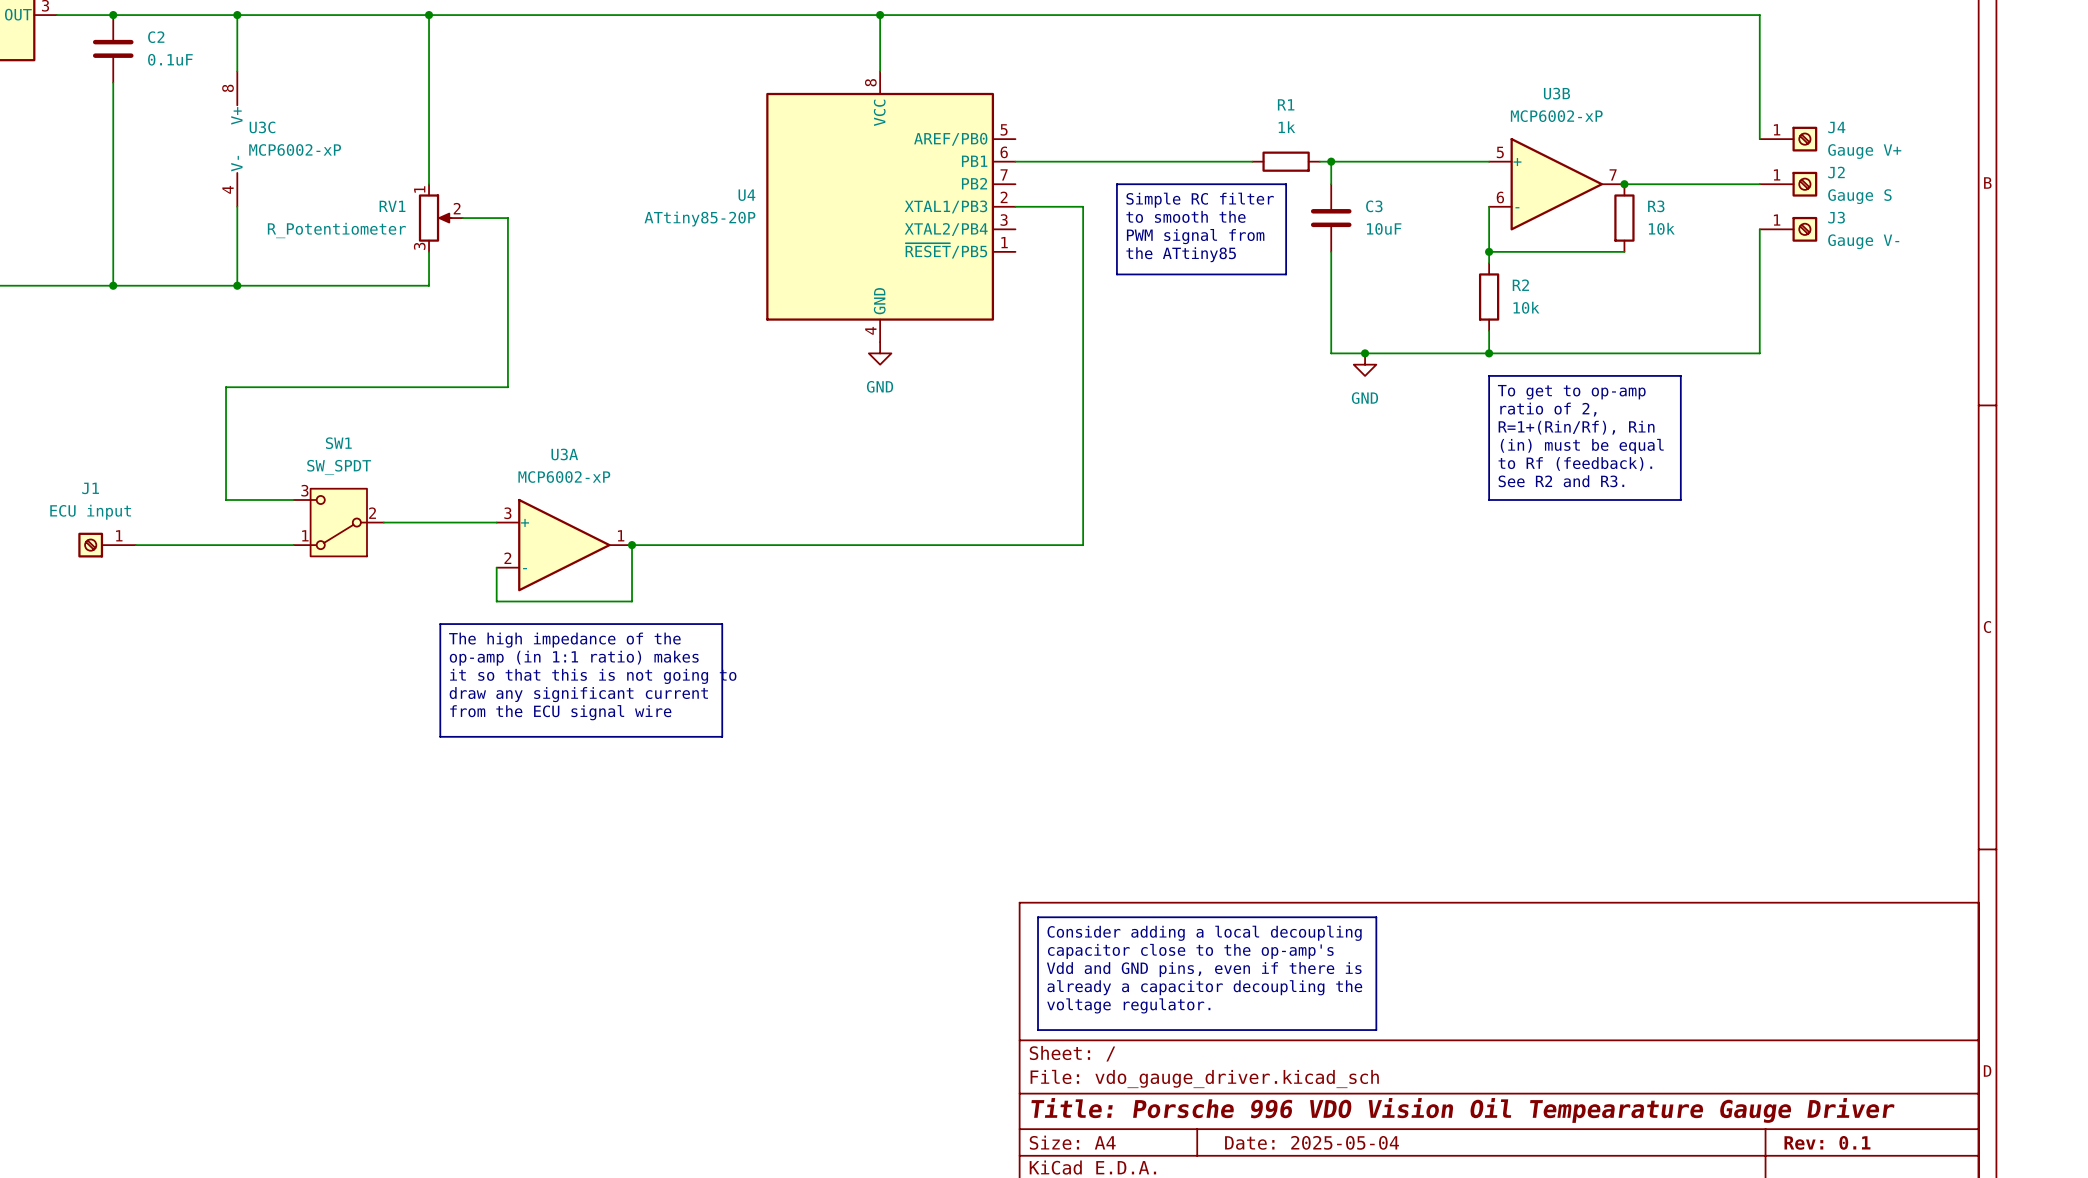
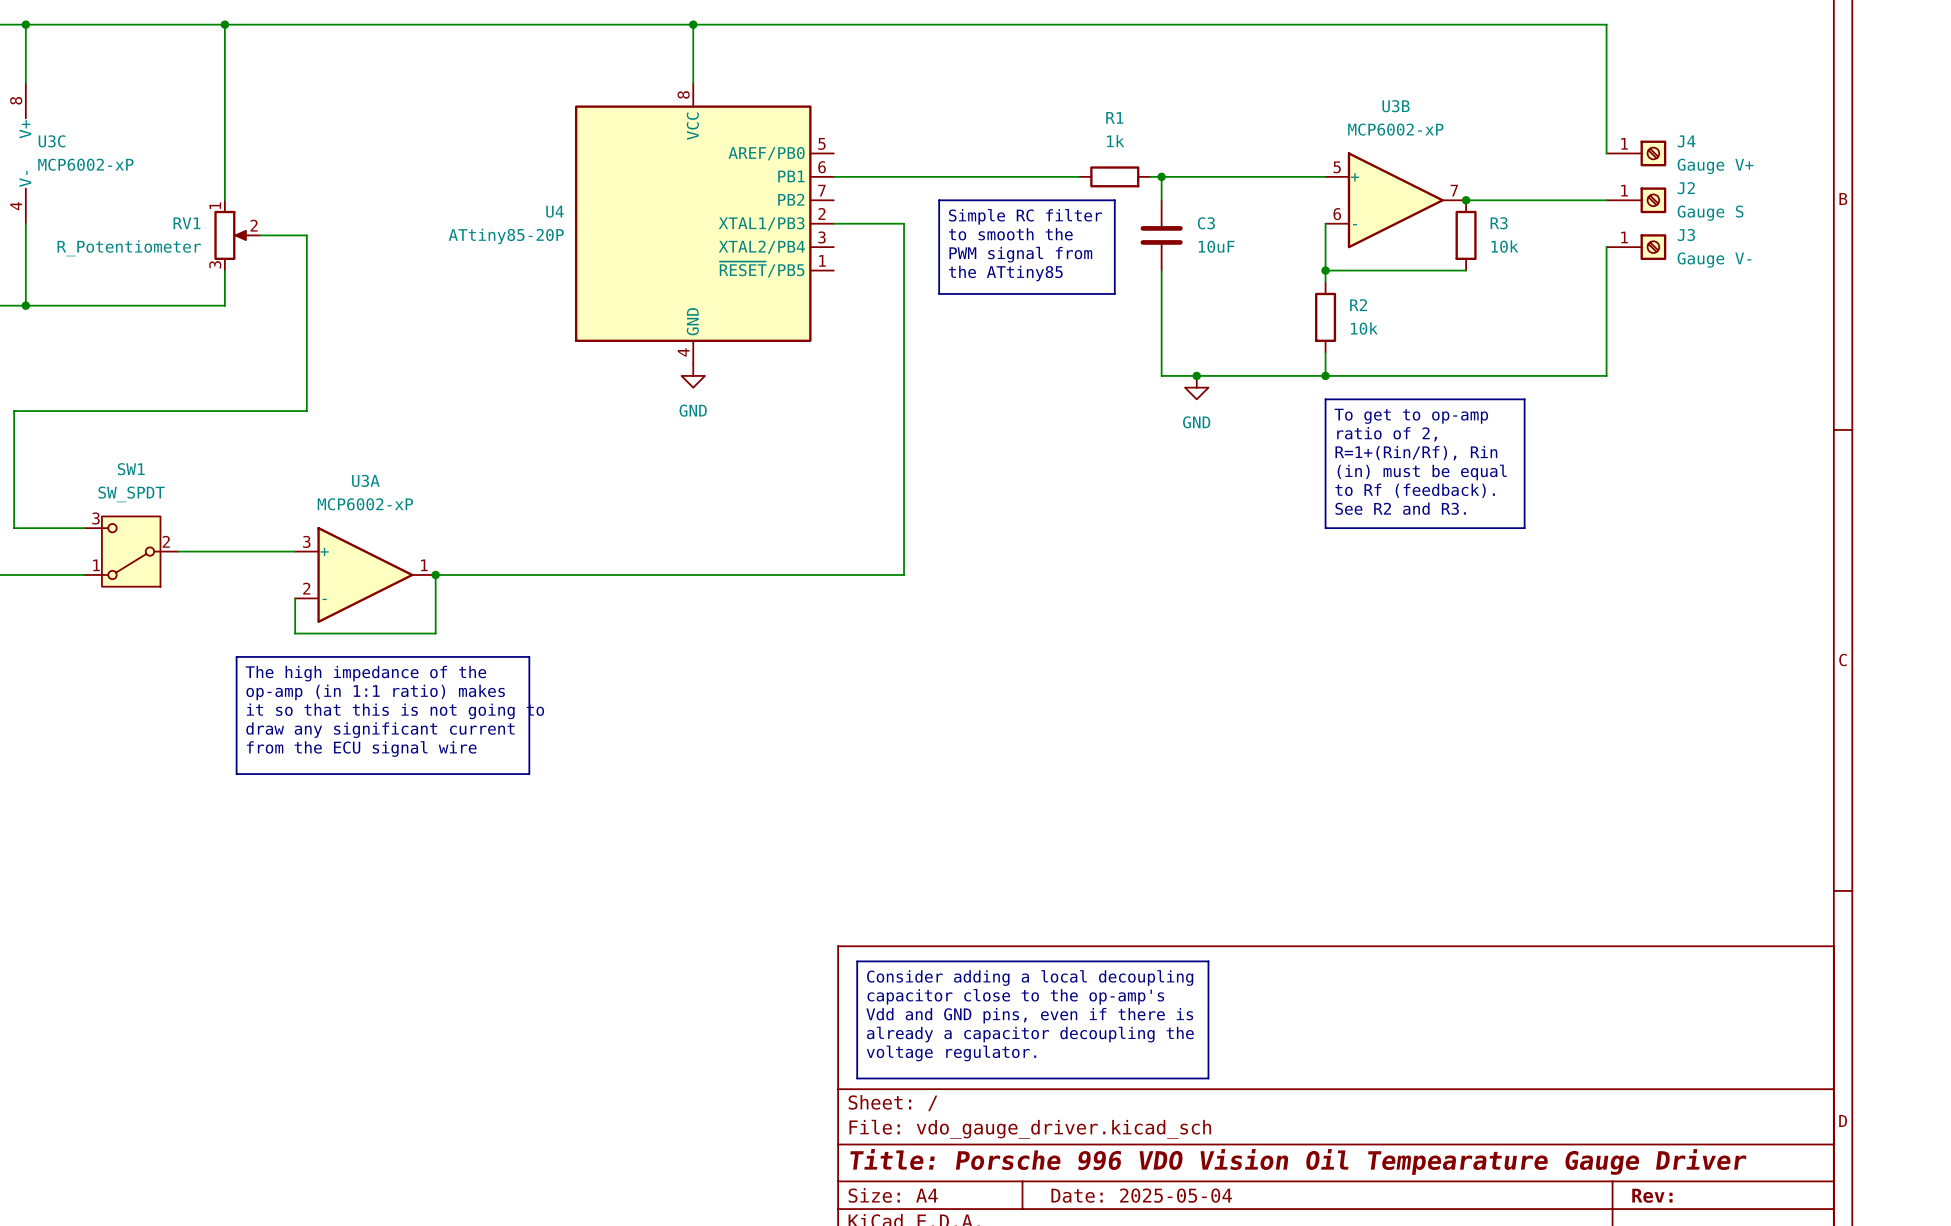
title block: Rev: 0.1 (1827, 1142) -> Rev: (1652, 1195)

